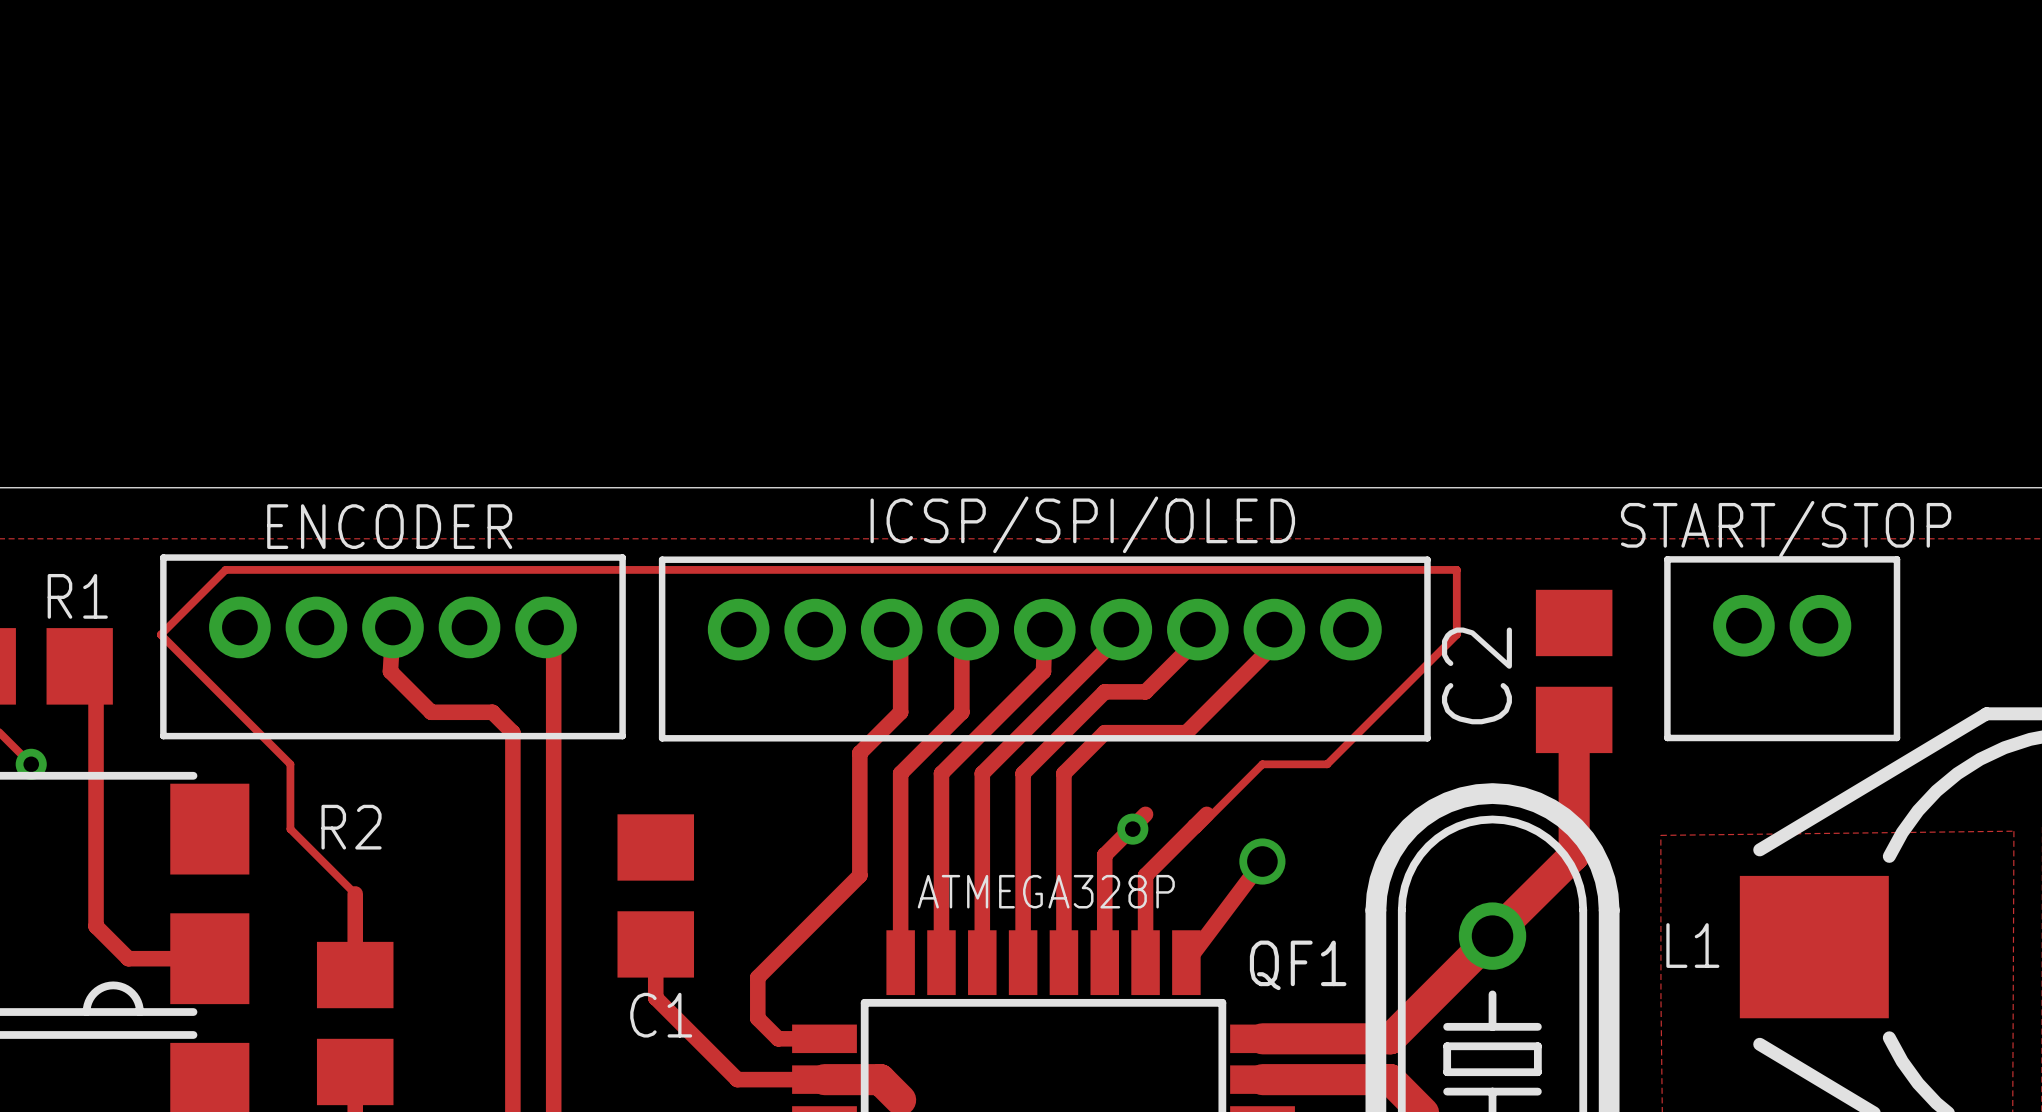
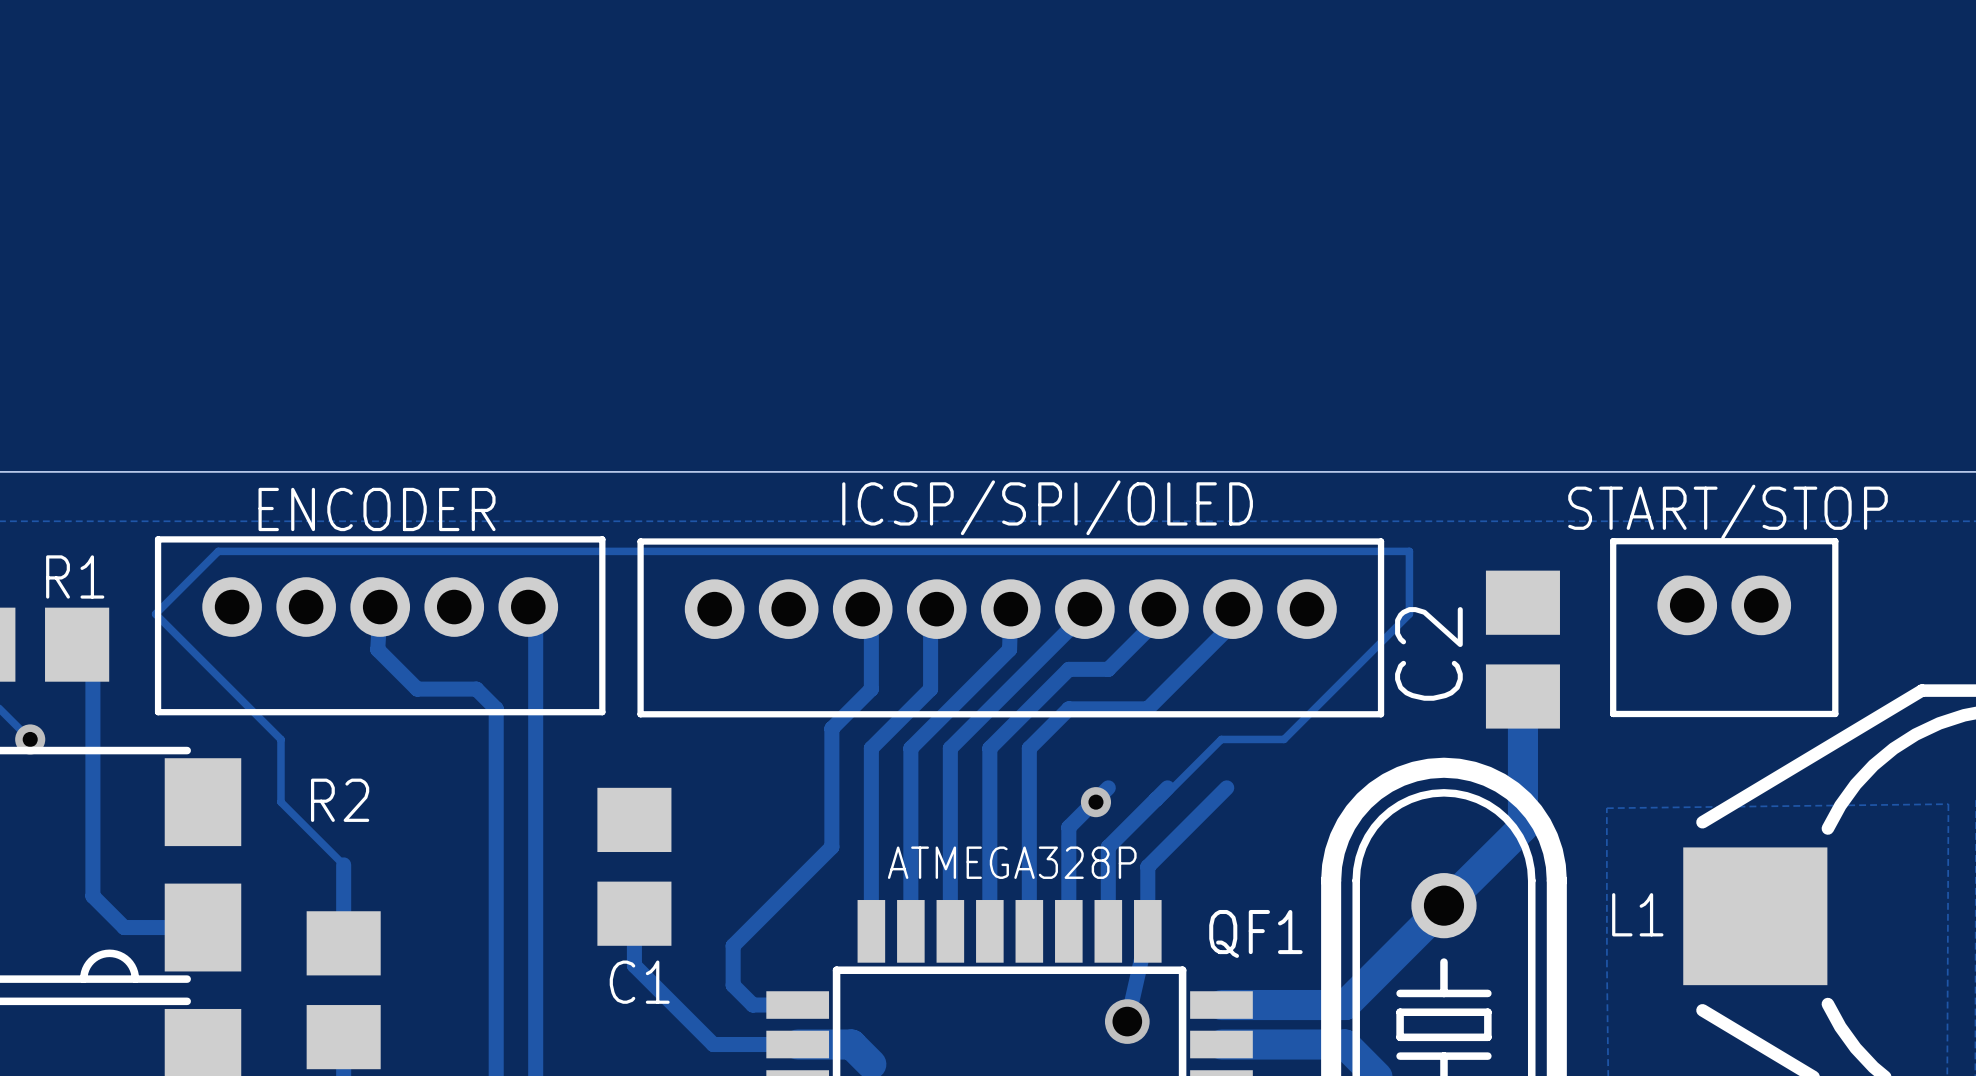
track: none -> (1226, 787) (1147, 866) (1147, 931) (1127, 1021)
track: (1262, 861) (1186, 962) -> none
via position: (1262, 861) -> (1127, 1021)

